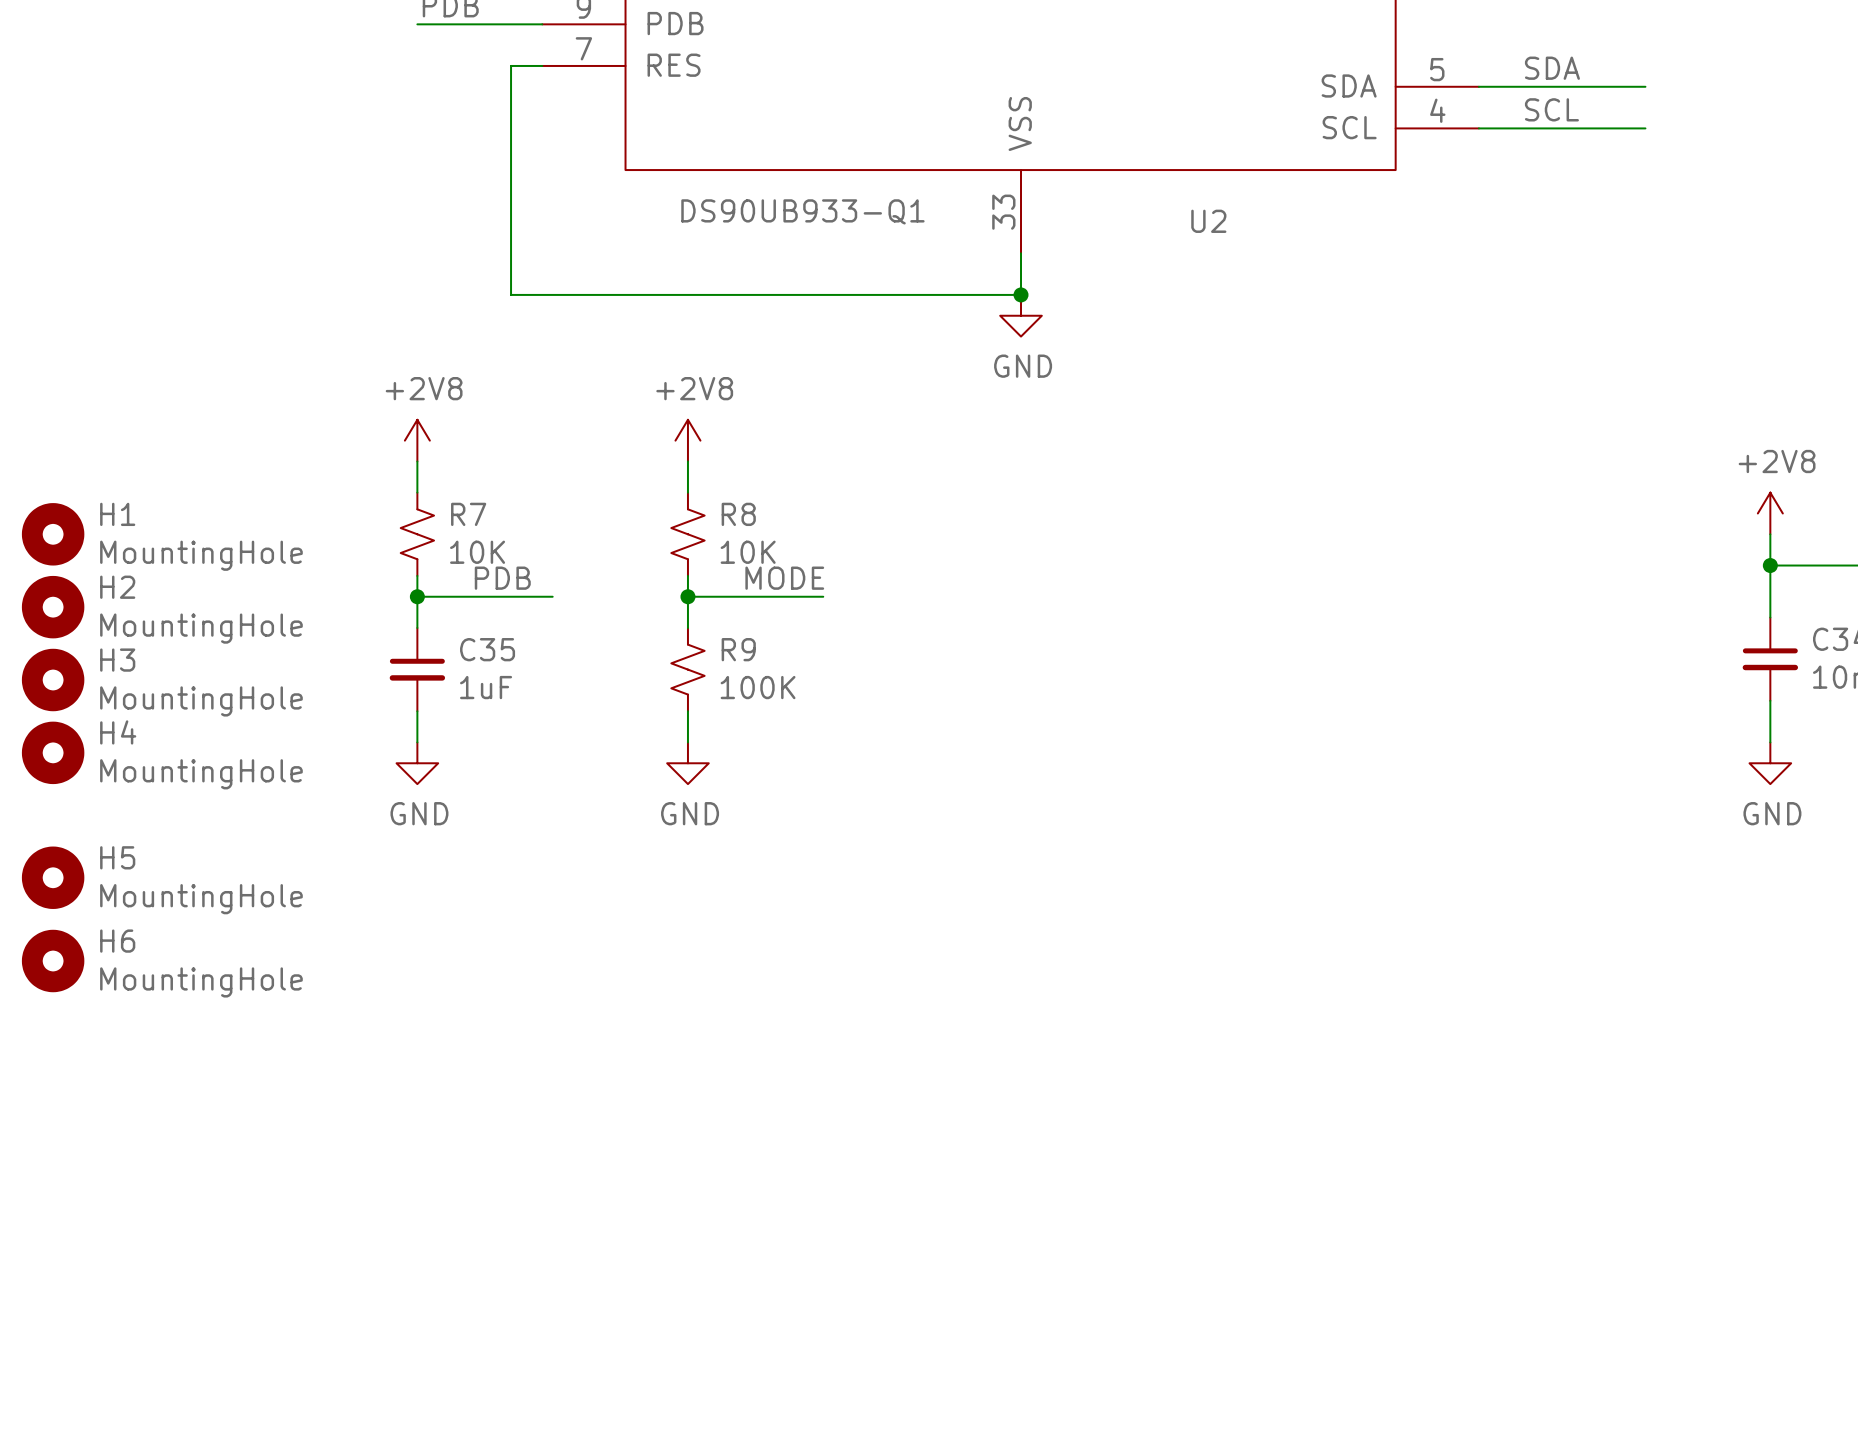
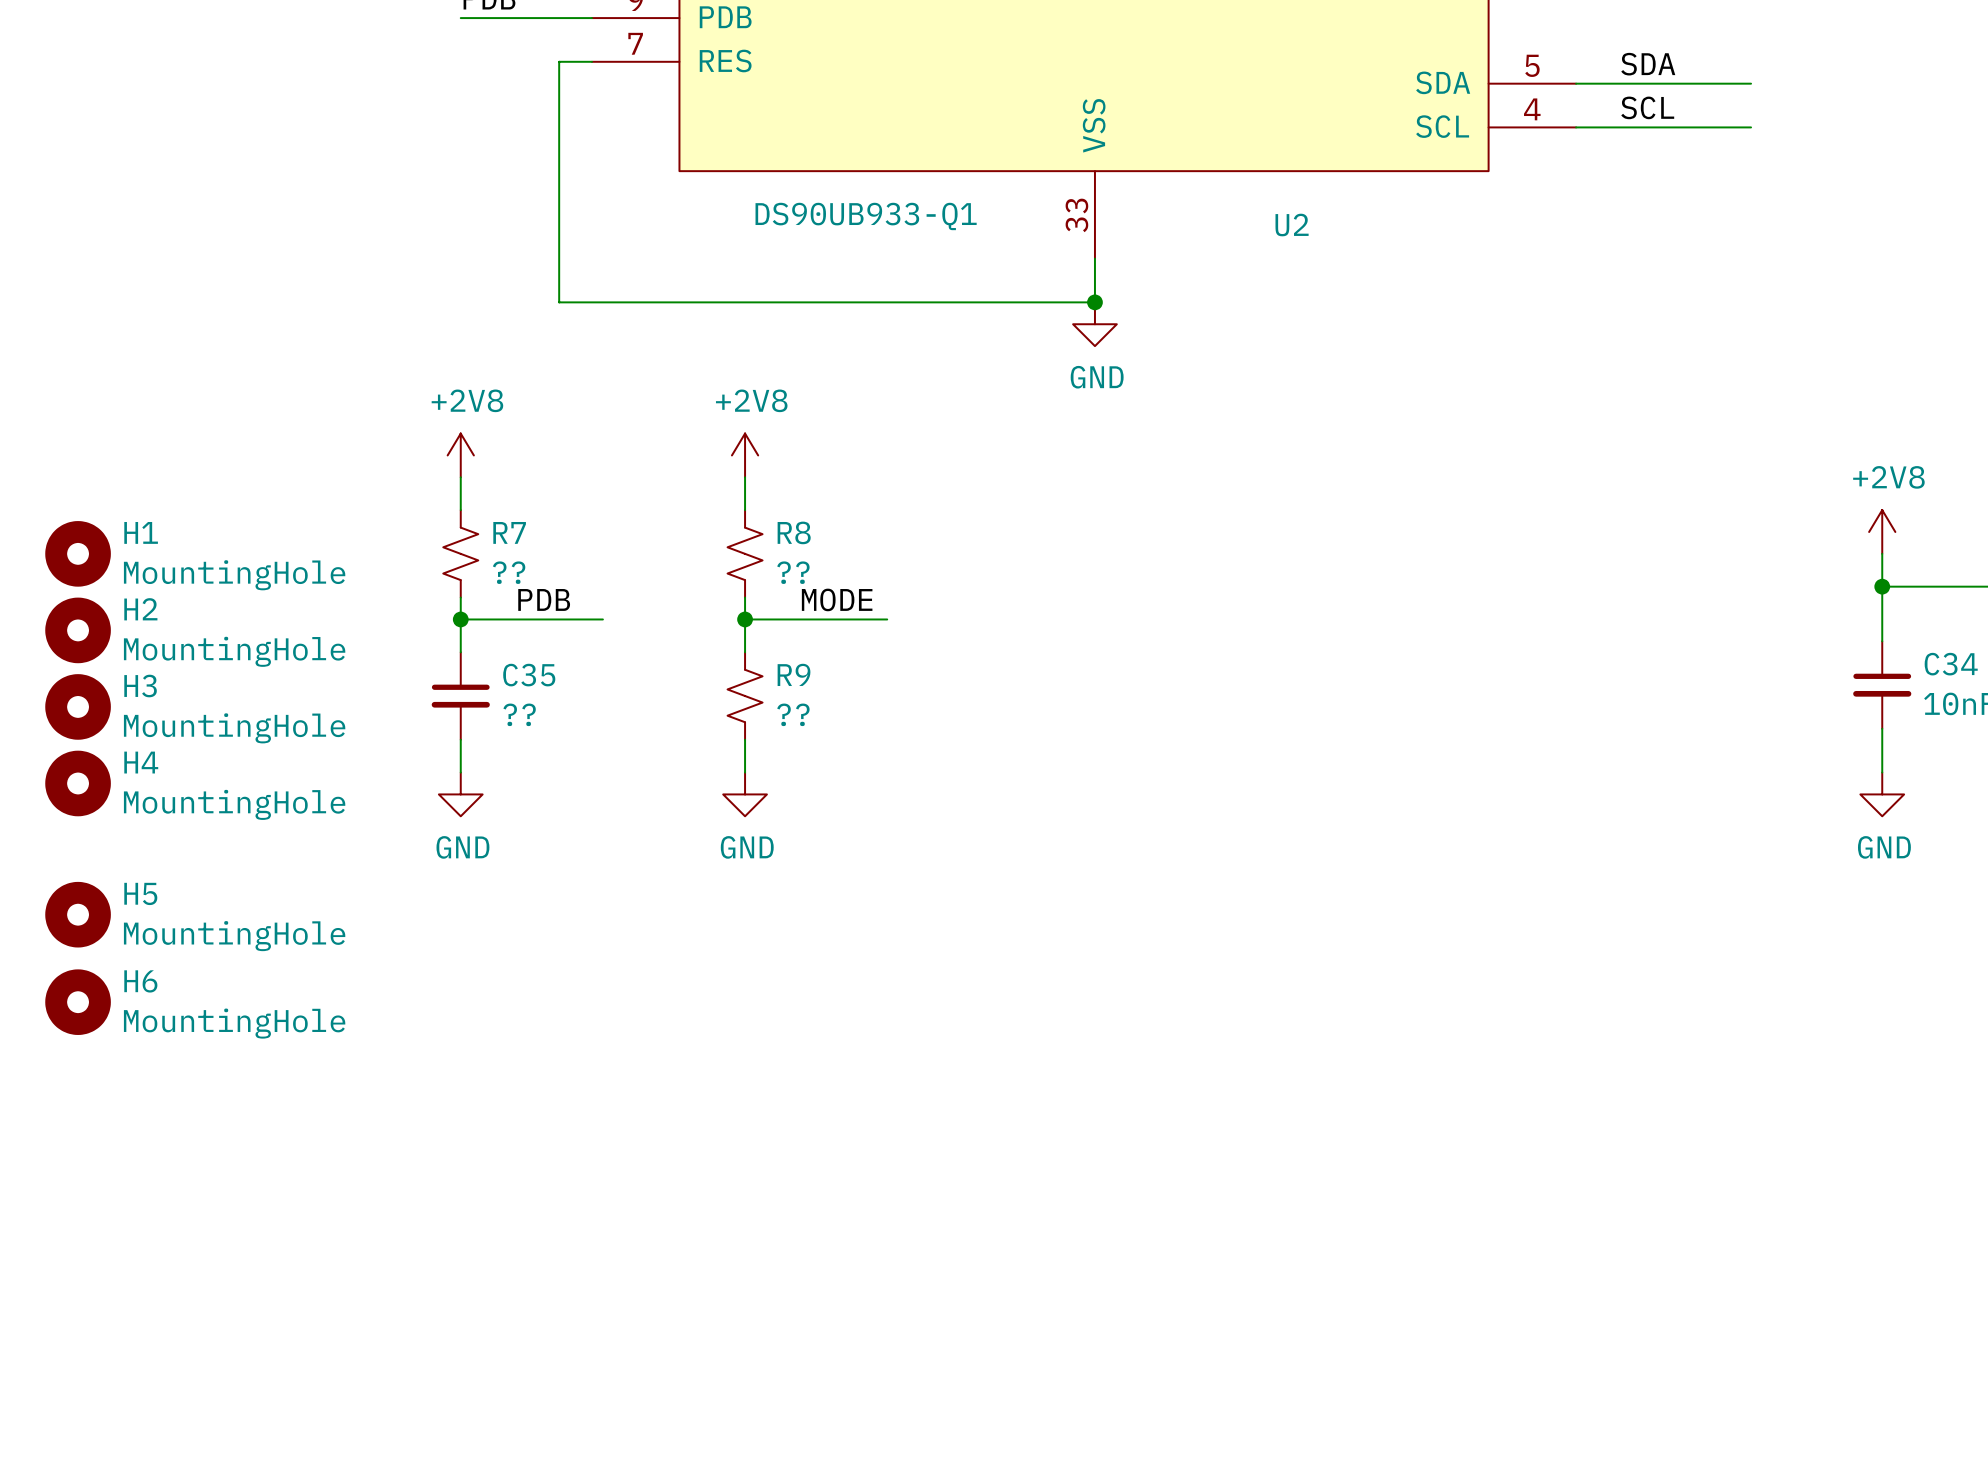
R7 value: 10K (477, 552) -> ?? (509, 572)
R8 value: 10K (748, 552) -> ?? (793, 572)
C35 value: 1uF (486, 687) -> ?? (519, 714)
R9 value: 100K (758, 687) -> ?? (793, 714)

